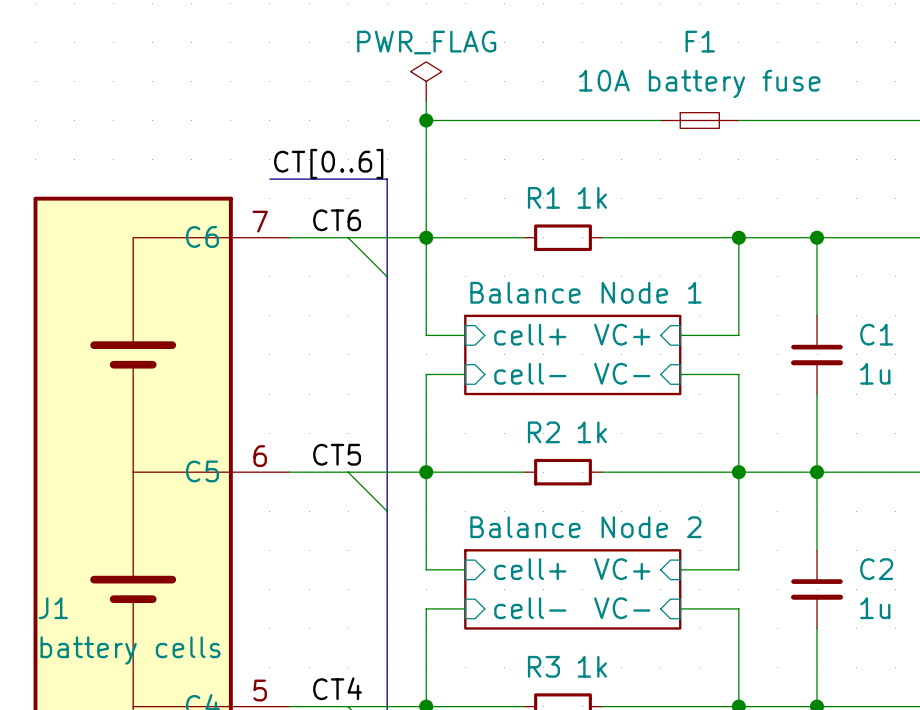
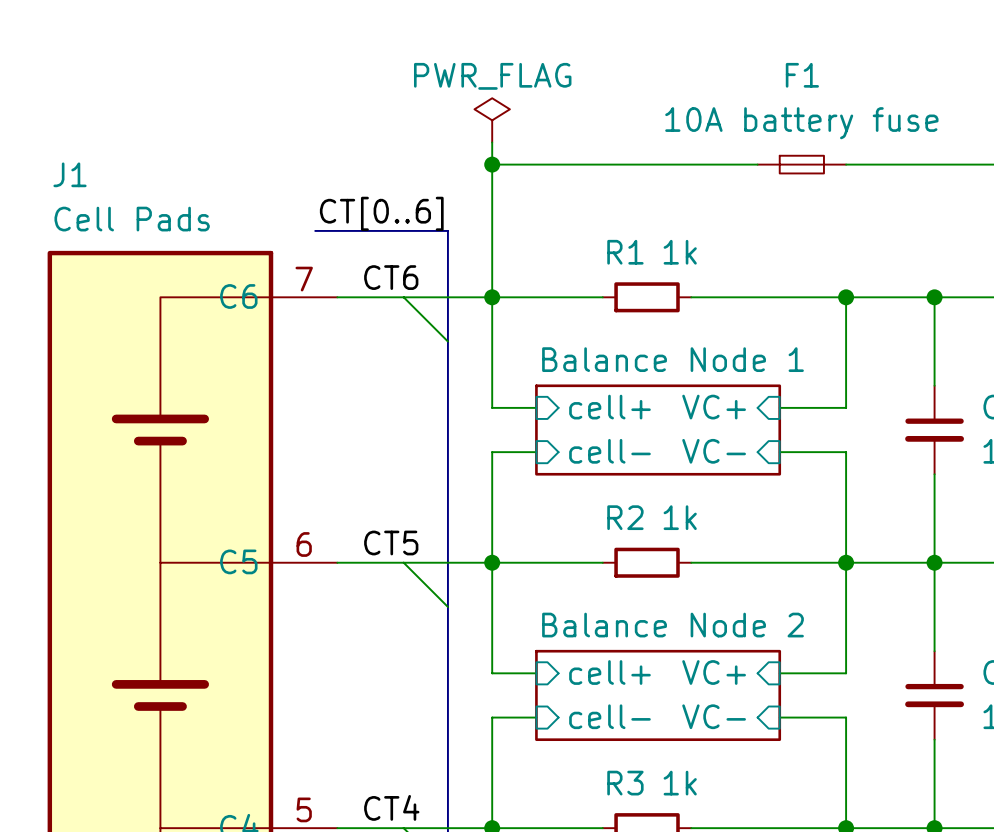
J1 name position: J1 (53, 608) -> J1 (70, 174)
J1 value: battery cells (130, 650) -> Cell Pads (132, 219)

